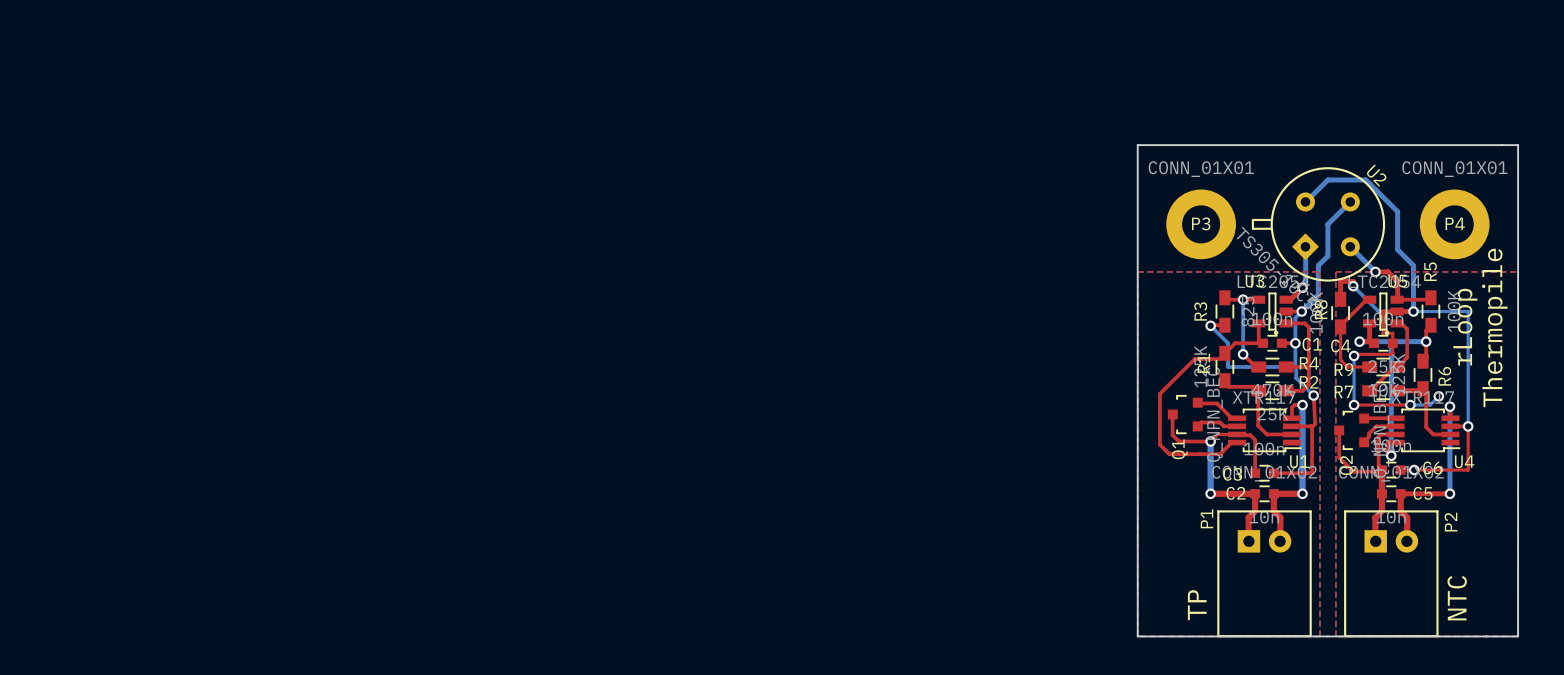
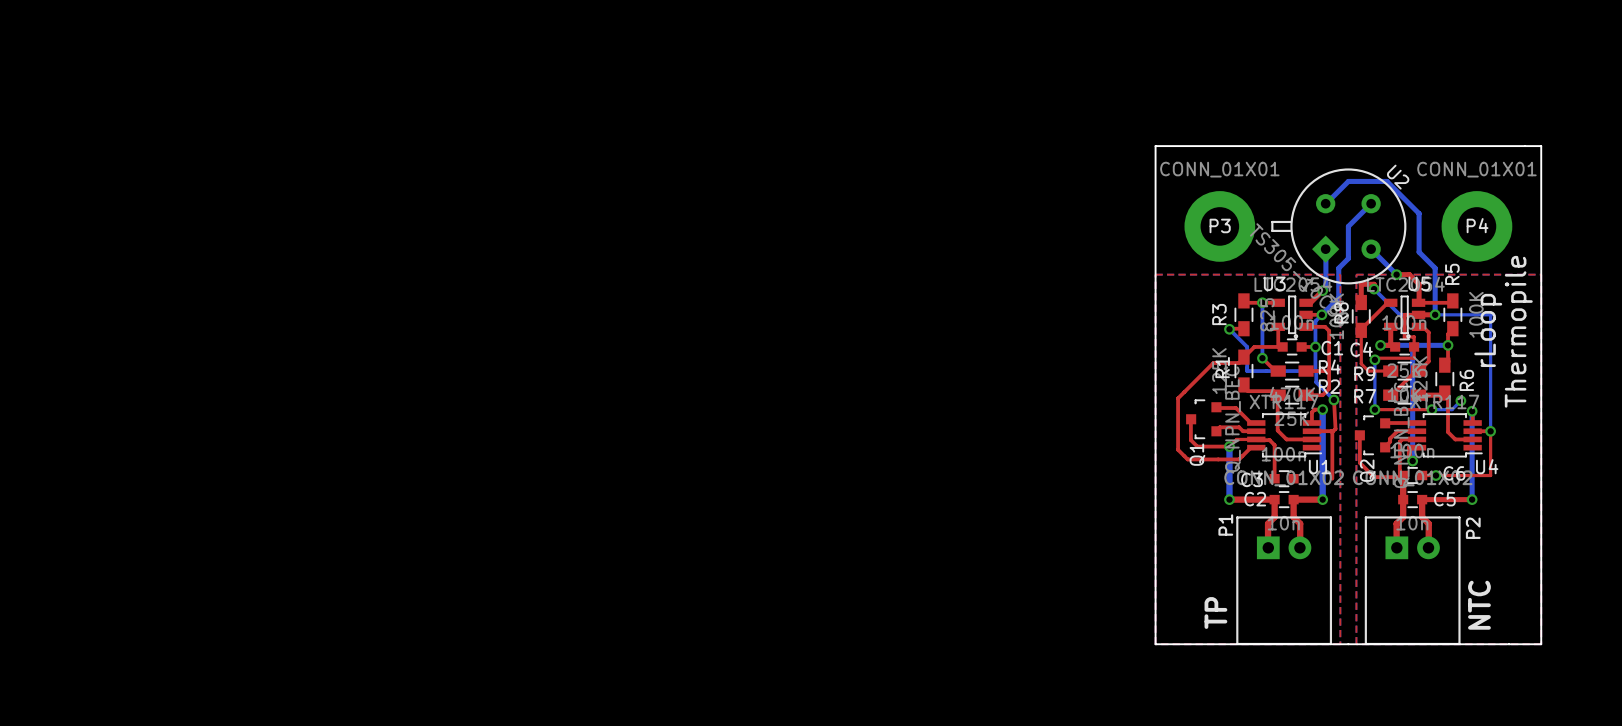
top track: (1273, 473) (1312, 473) -> none

